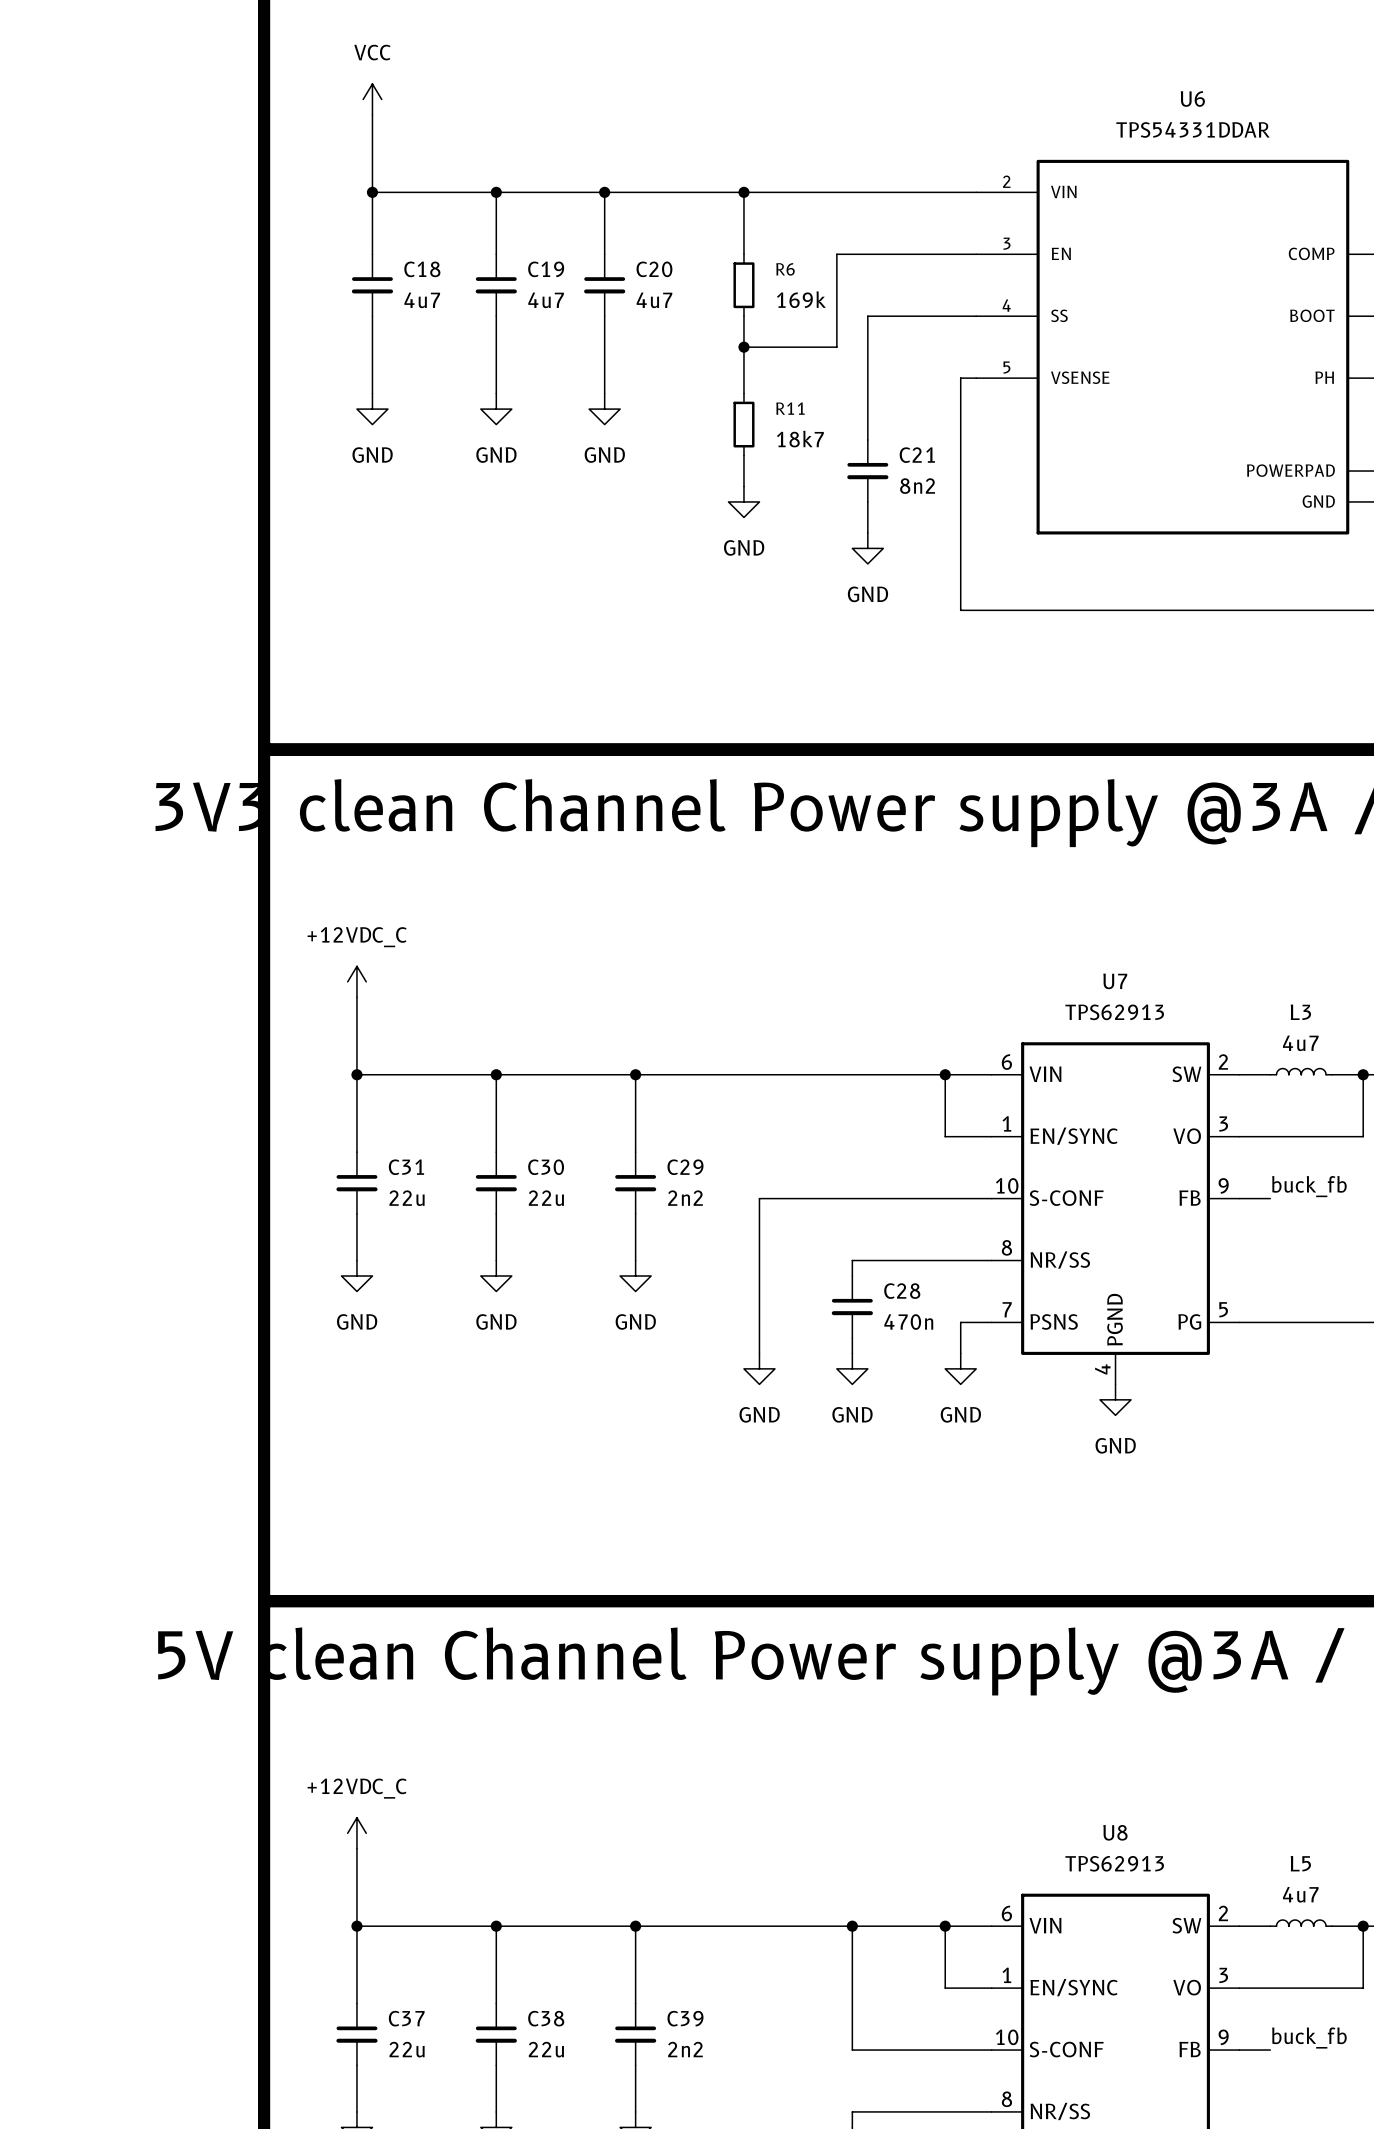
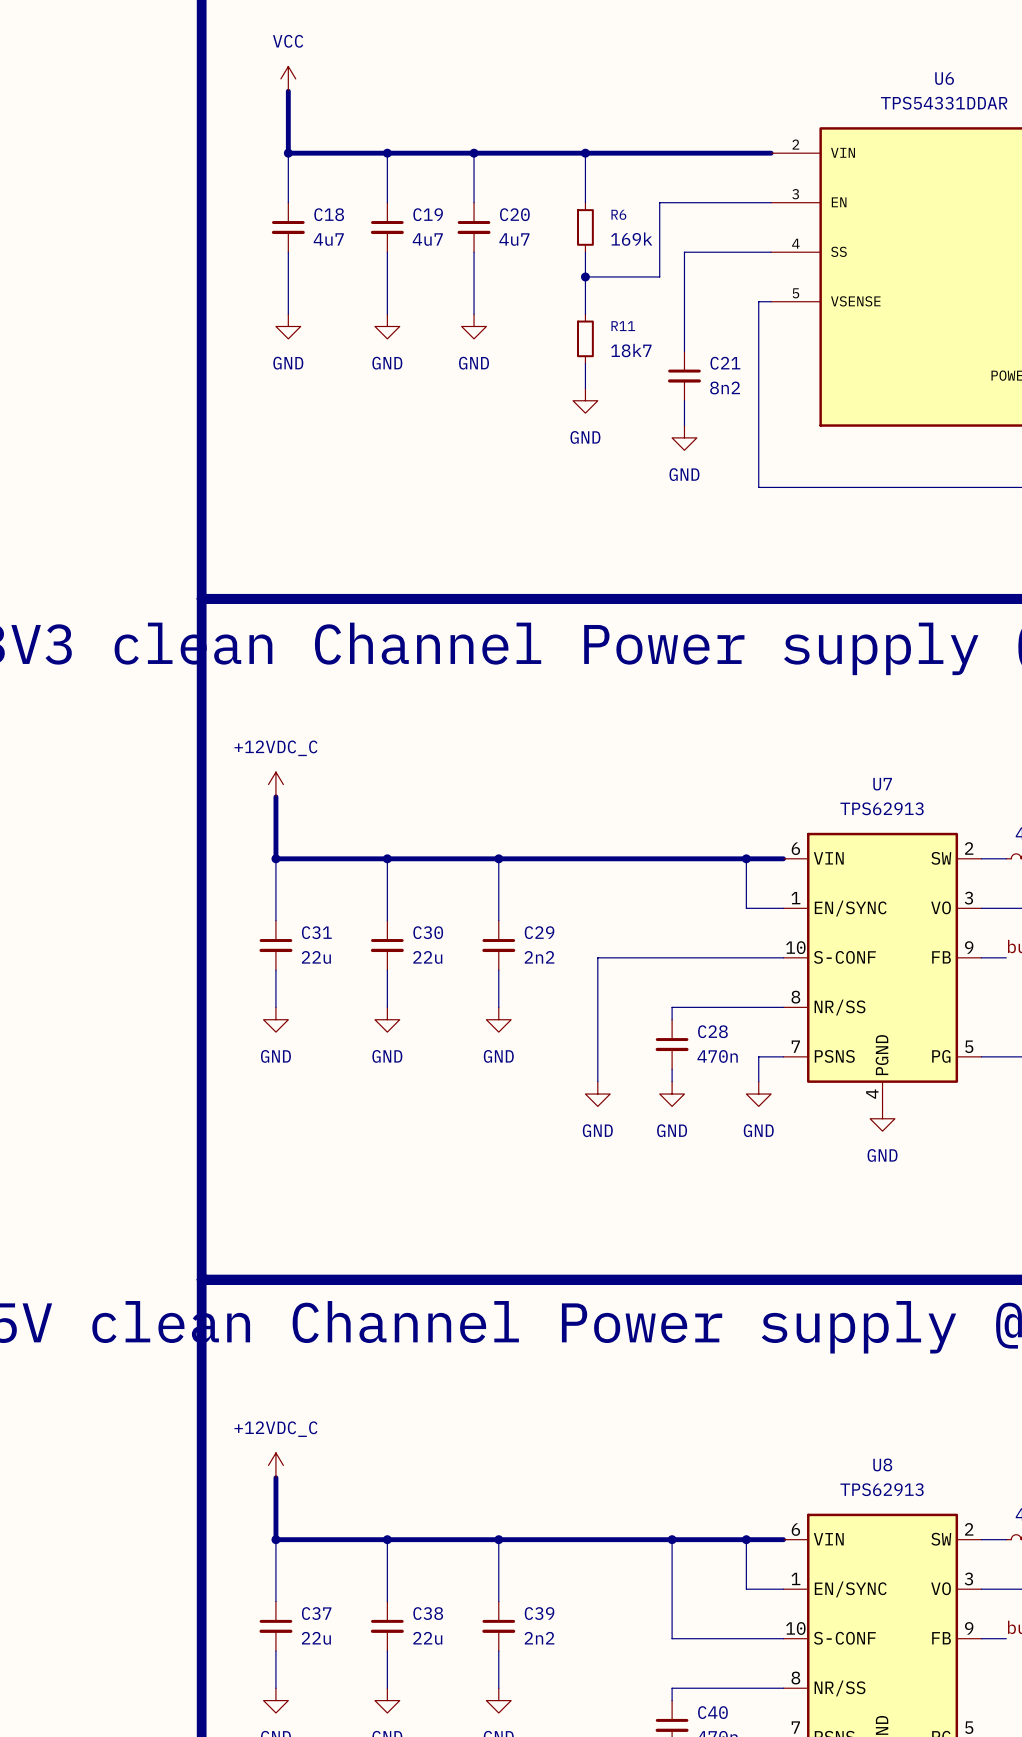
line: none -> (288, 91) (288, 153) (771, 153)
line: none -> (275, 796) (275, 858) (783, 858)
line: none -> (275, 1477) (275, 1539) (783, 1539)

